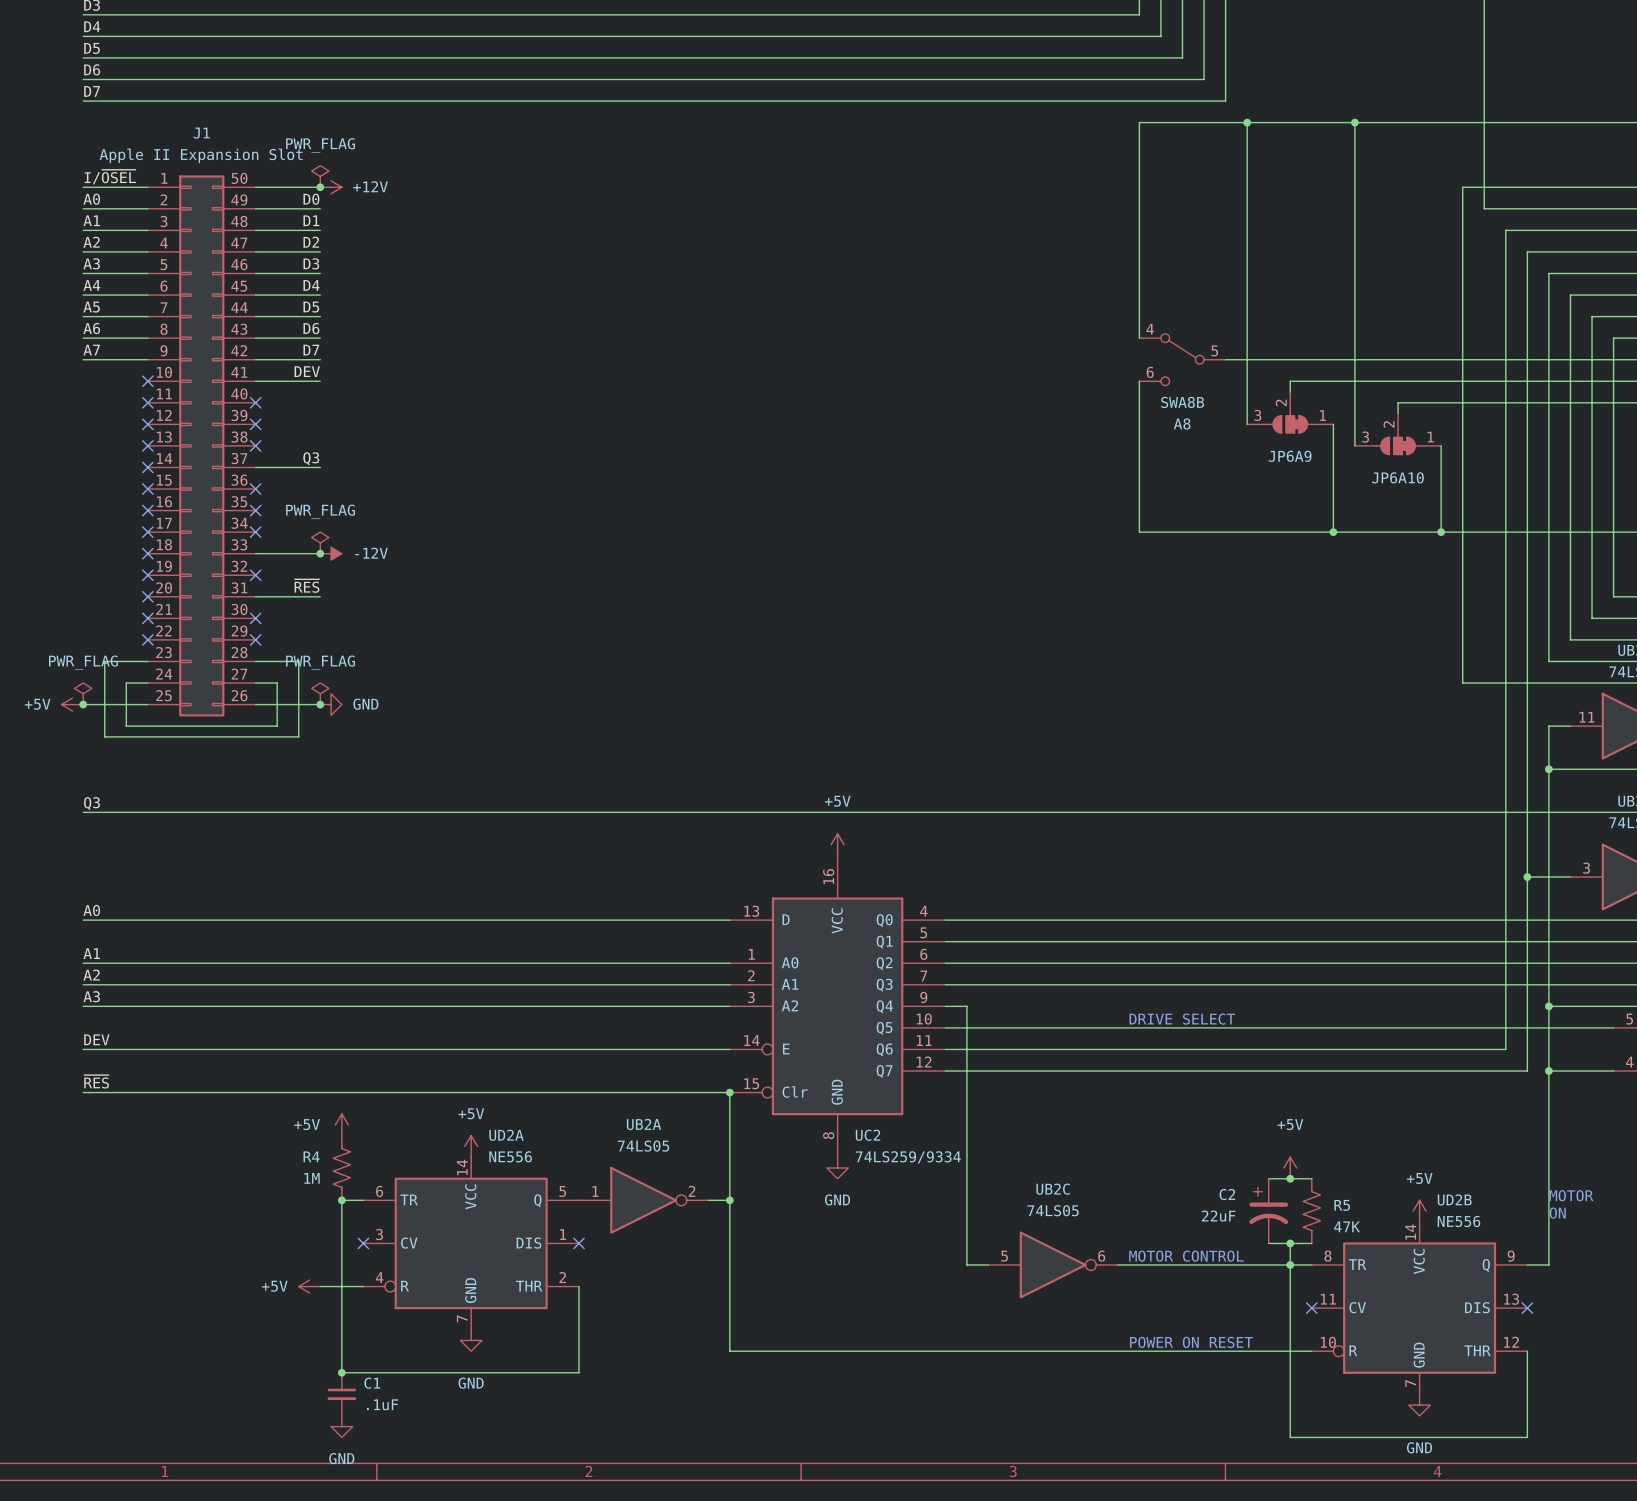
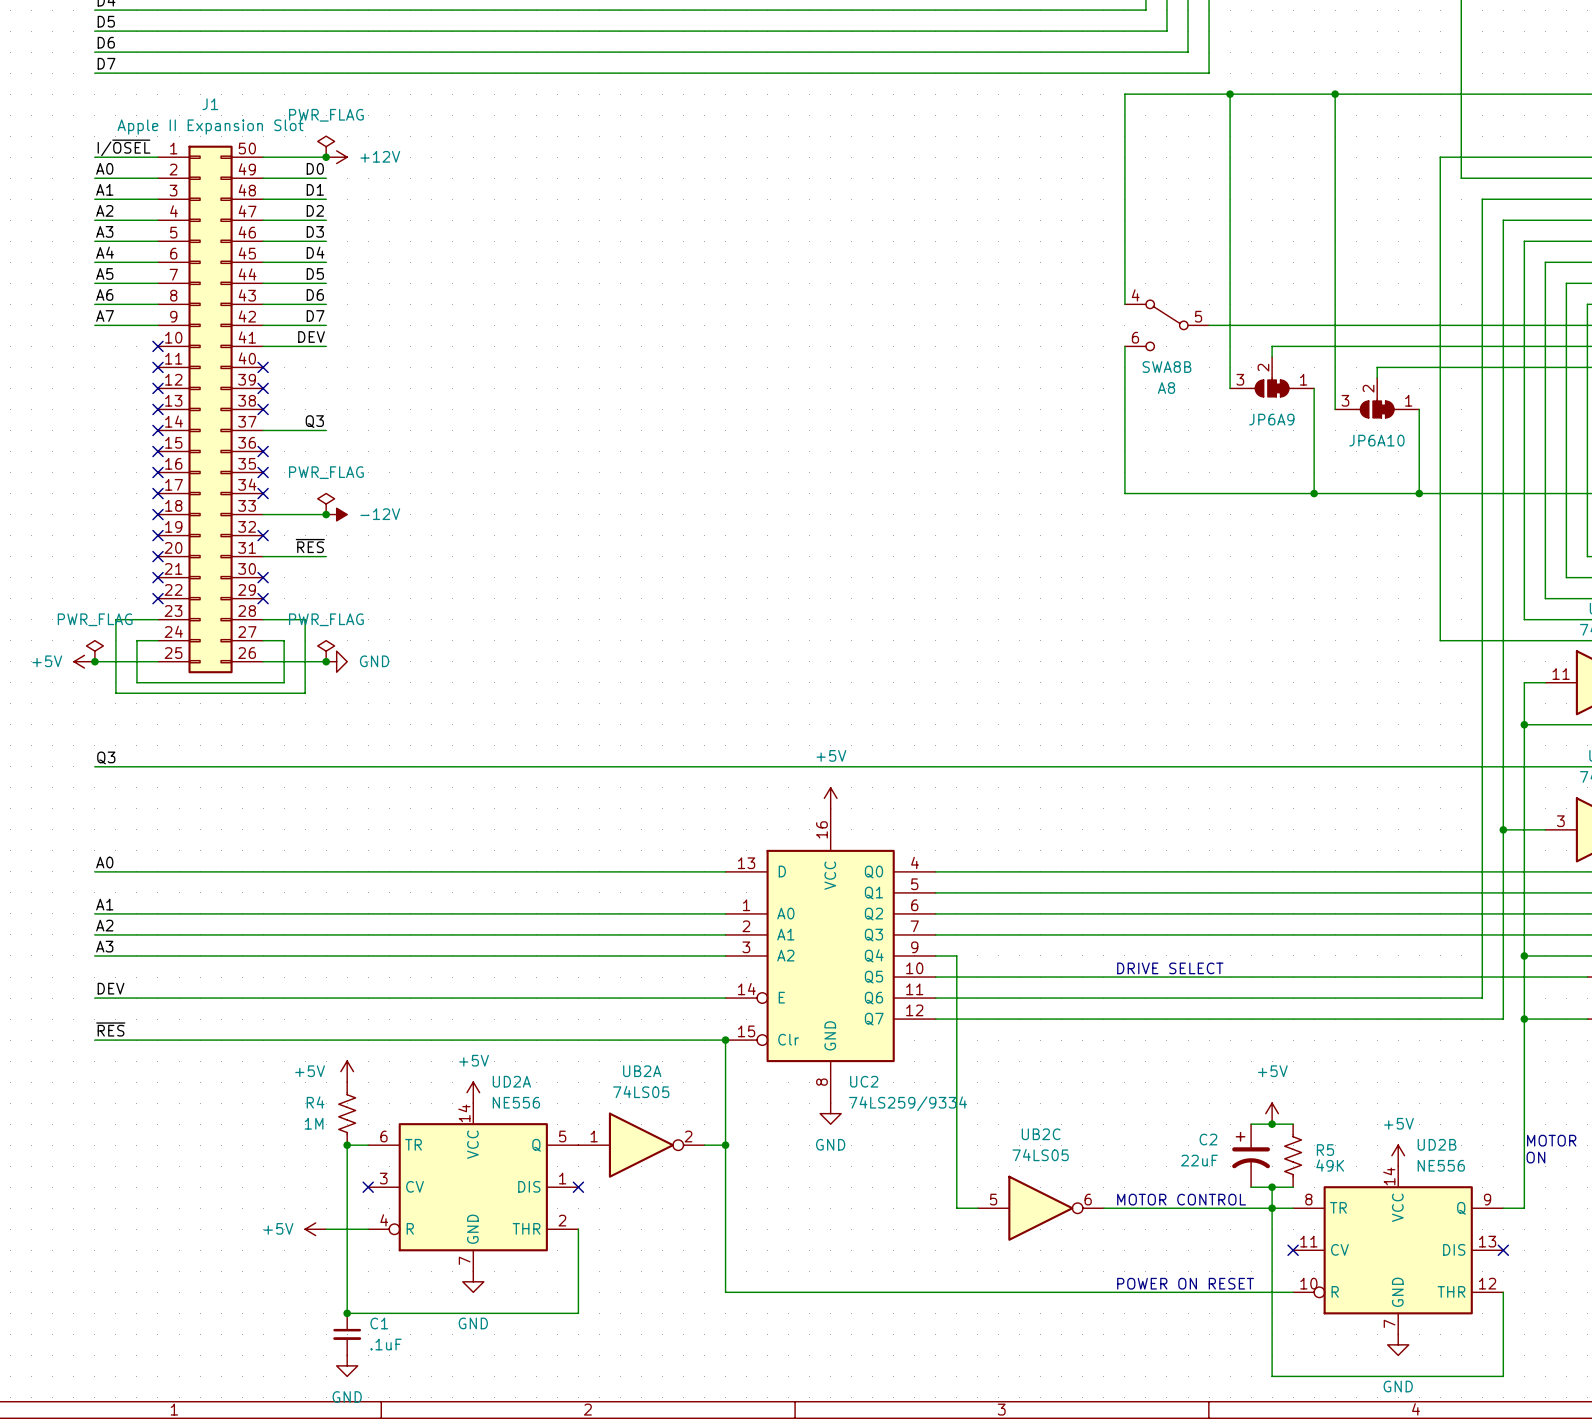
R5 value: 47K (1347, 1226) -> 49K (1330, 1165)

